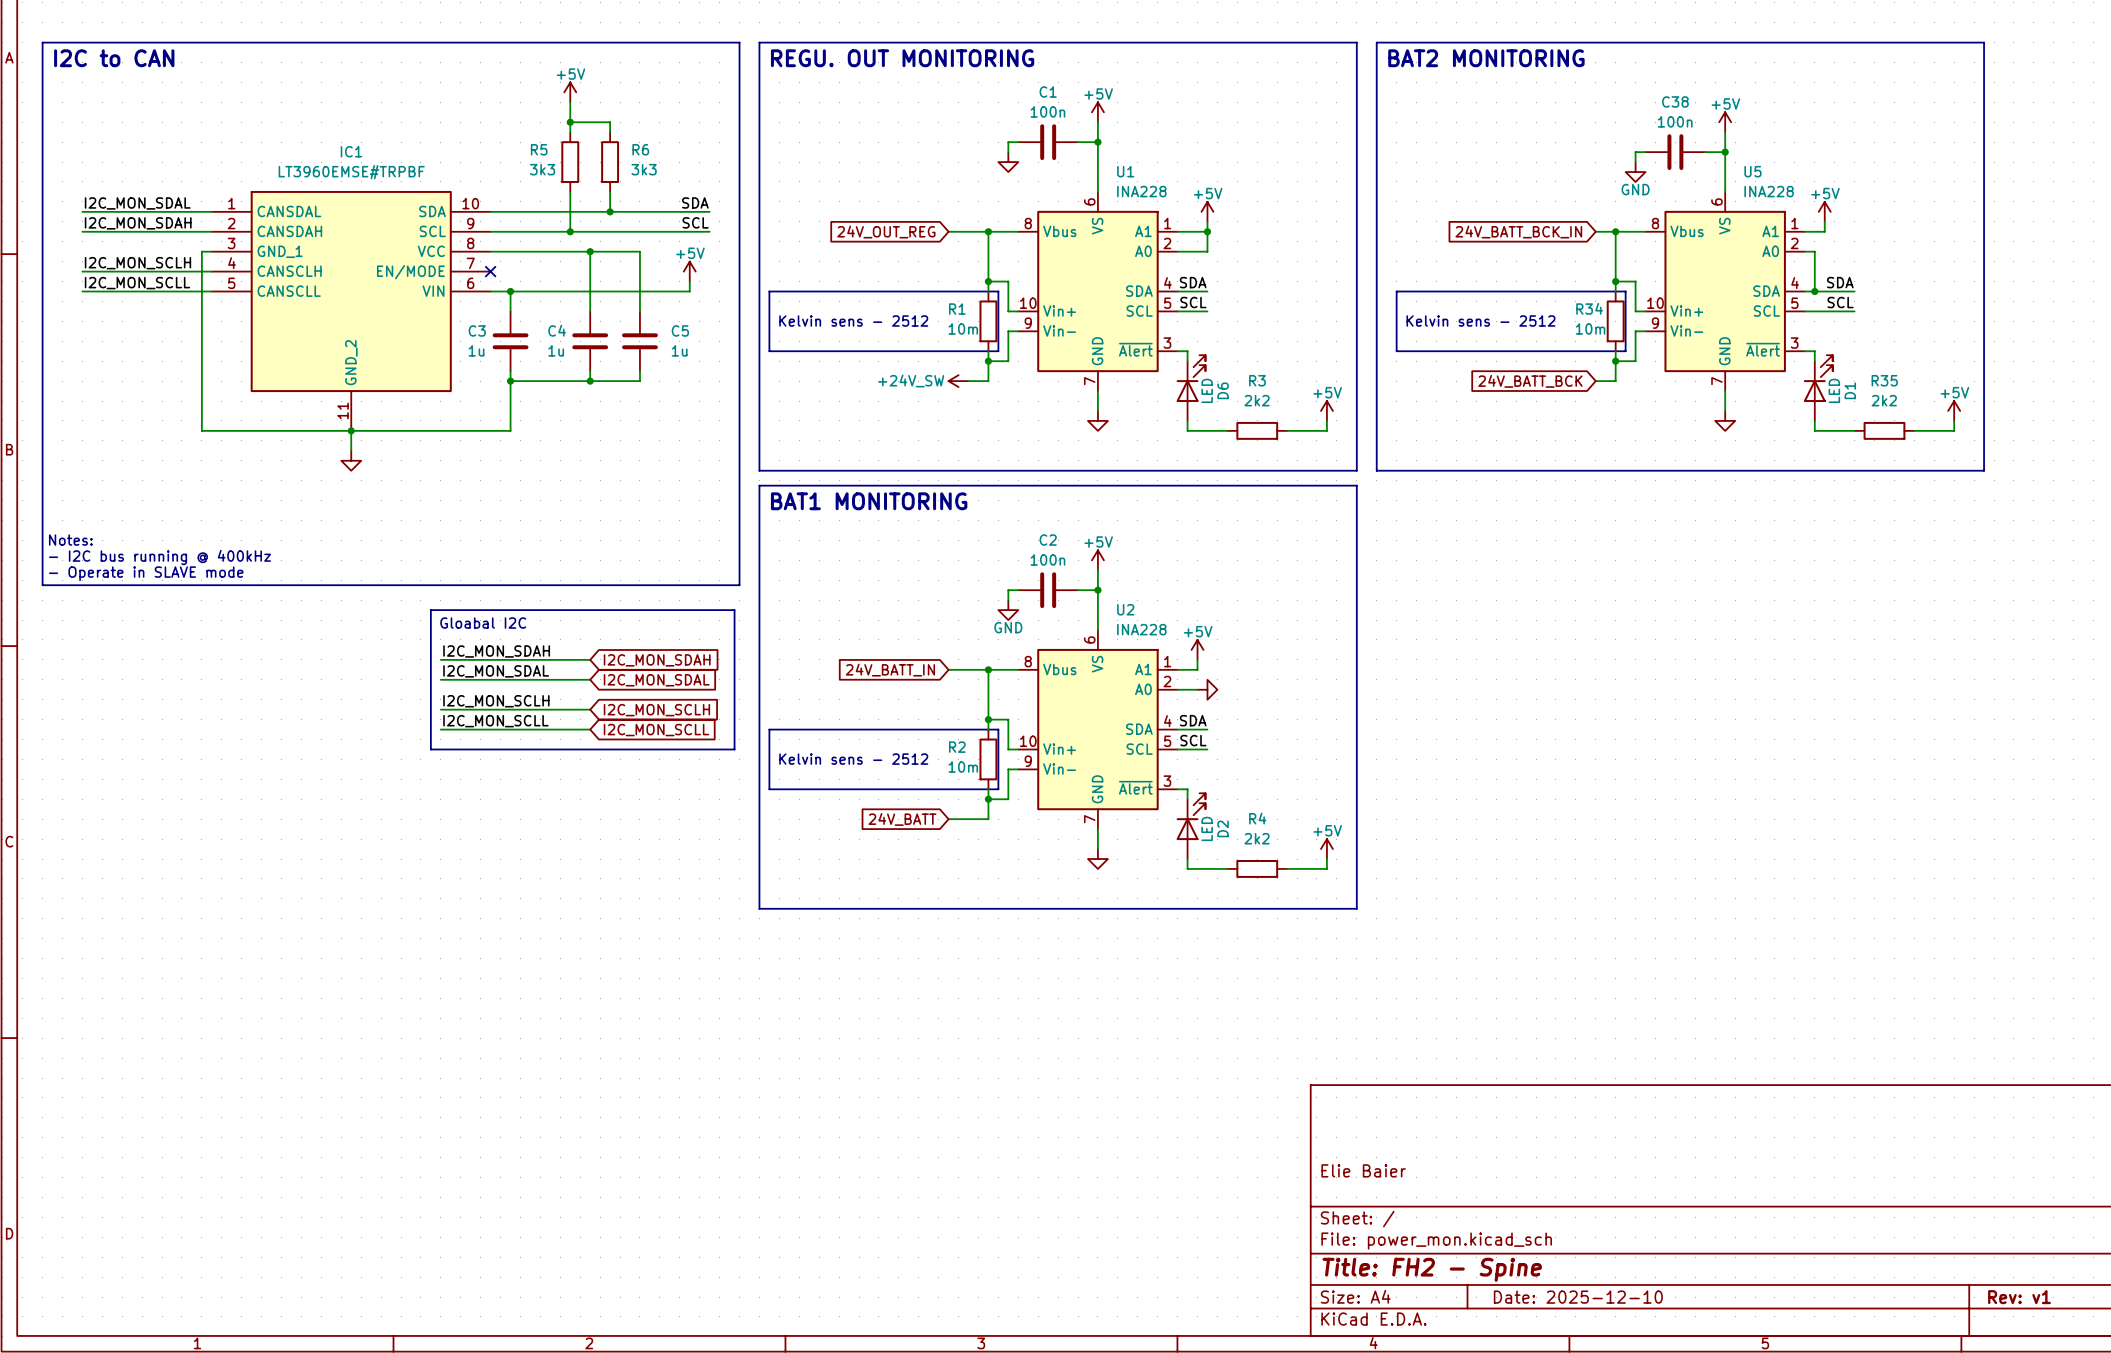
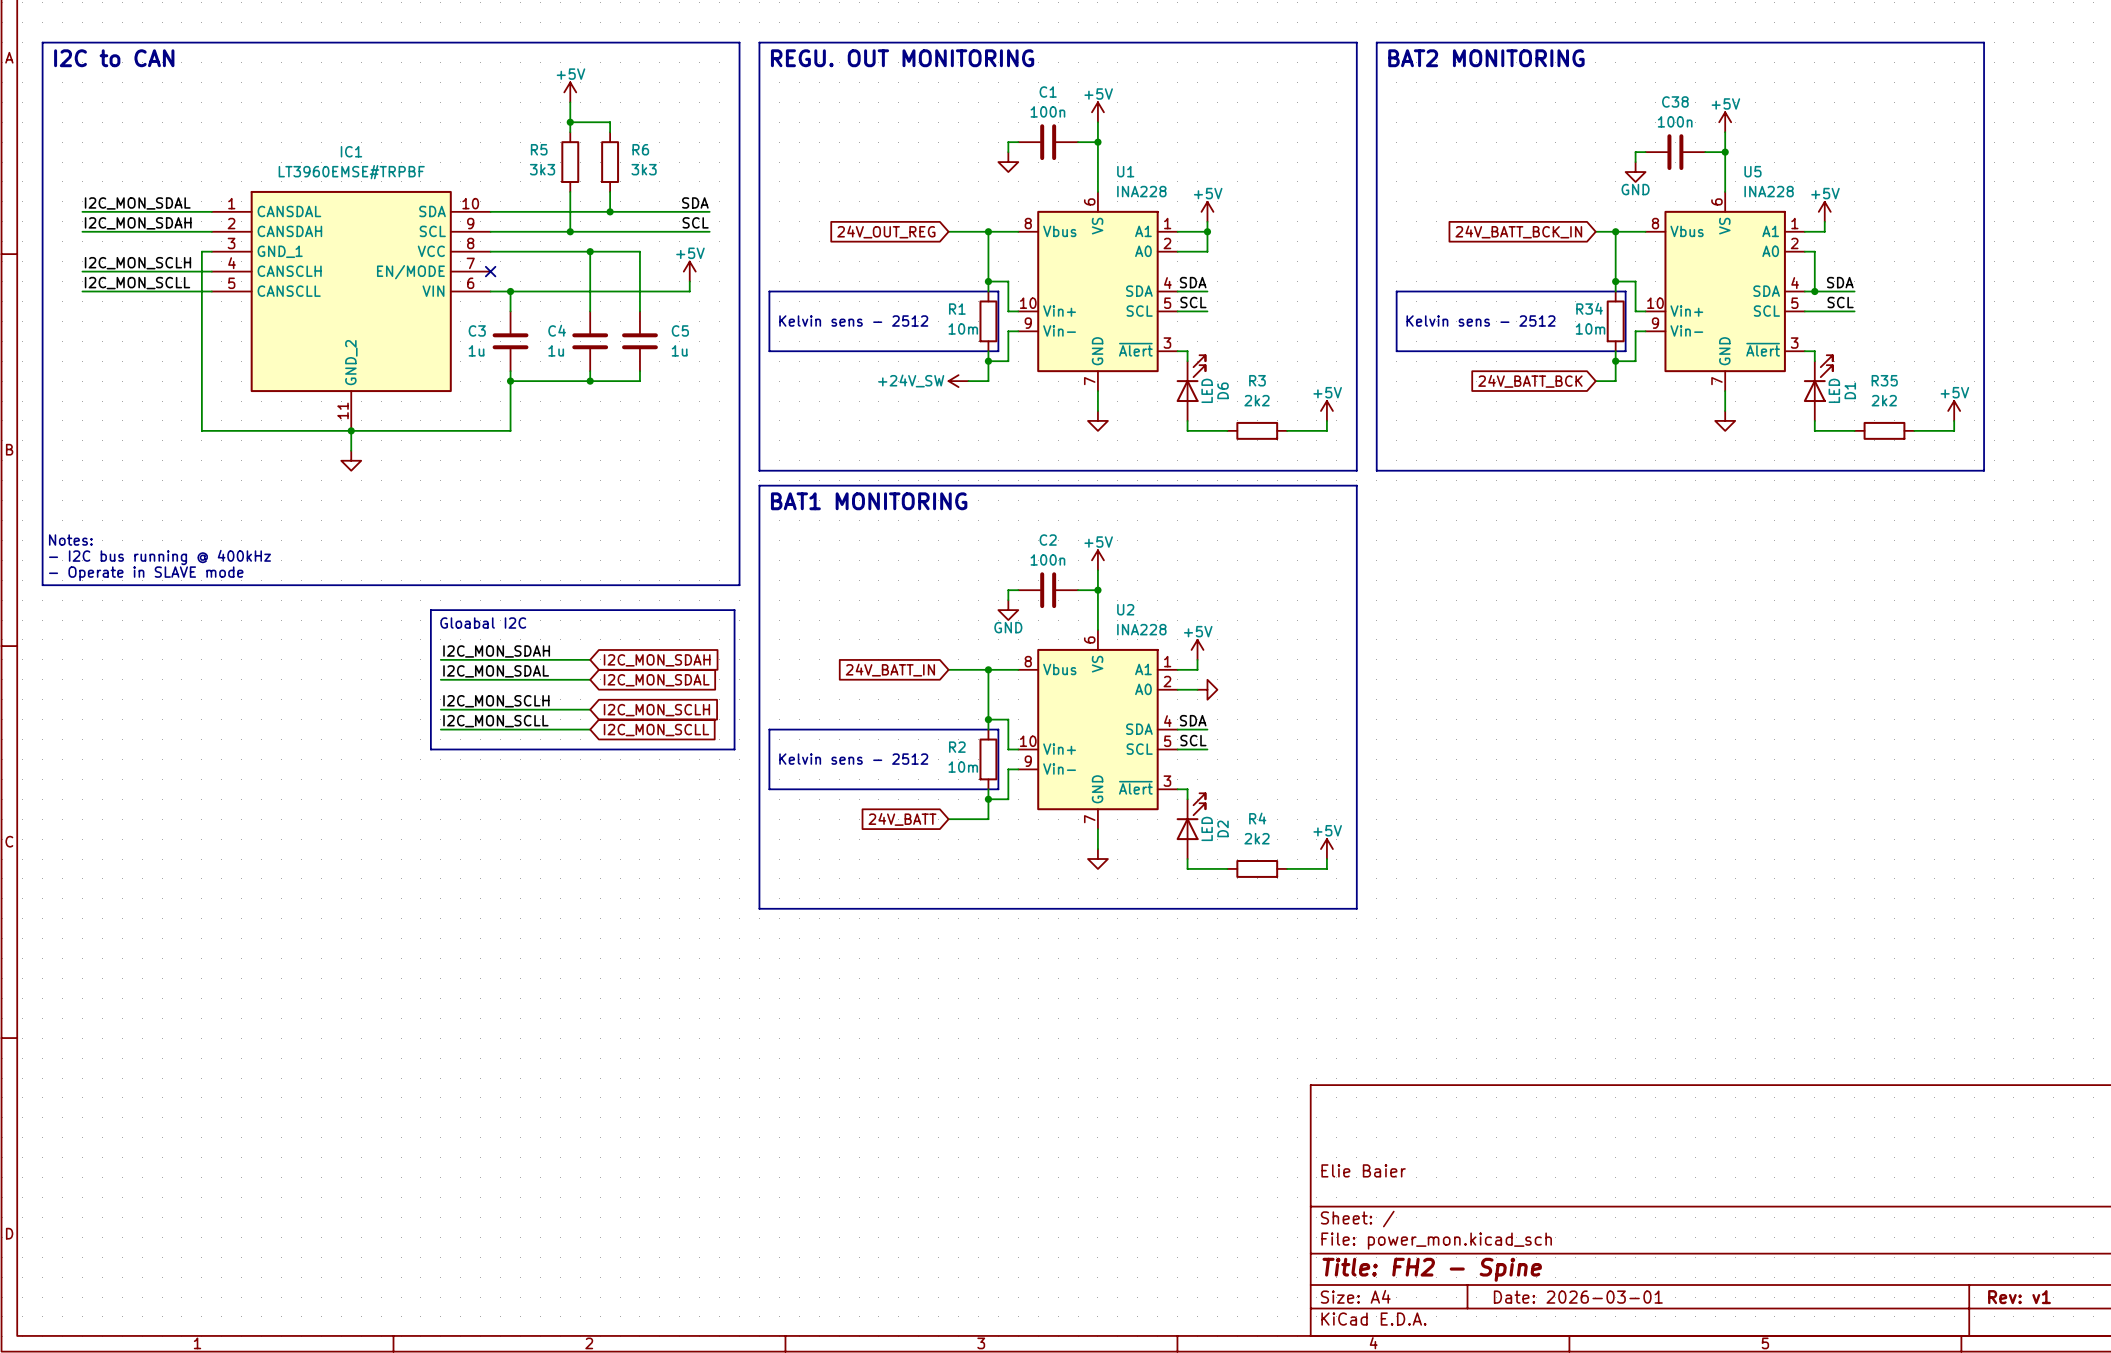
title block: Date: 2025-12-10 (1578, 1297) -> Date: 2026-03-01 (1578, 1297)

